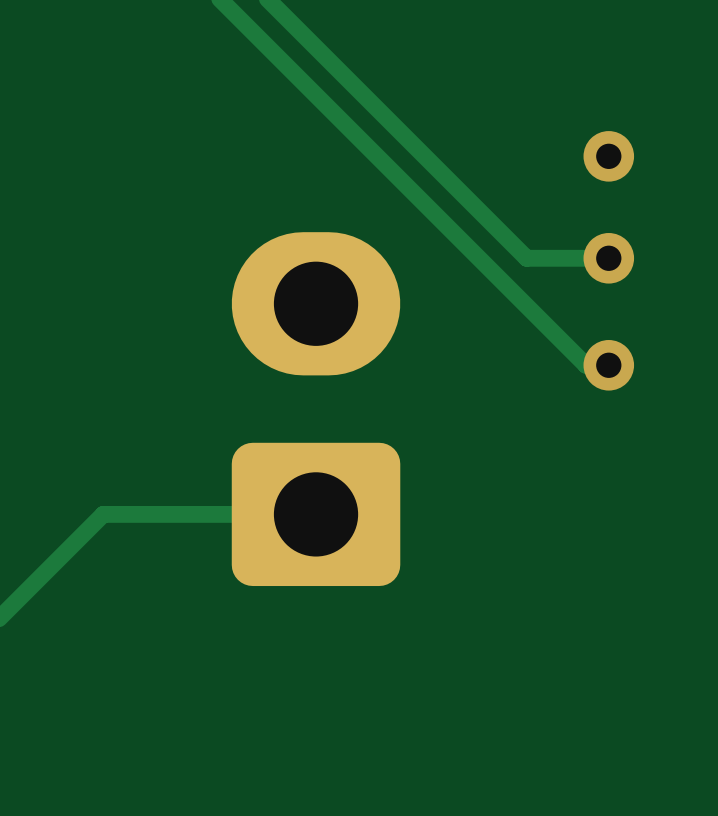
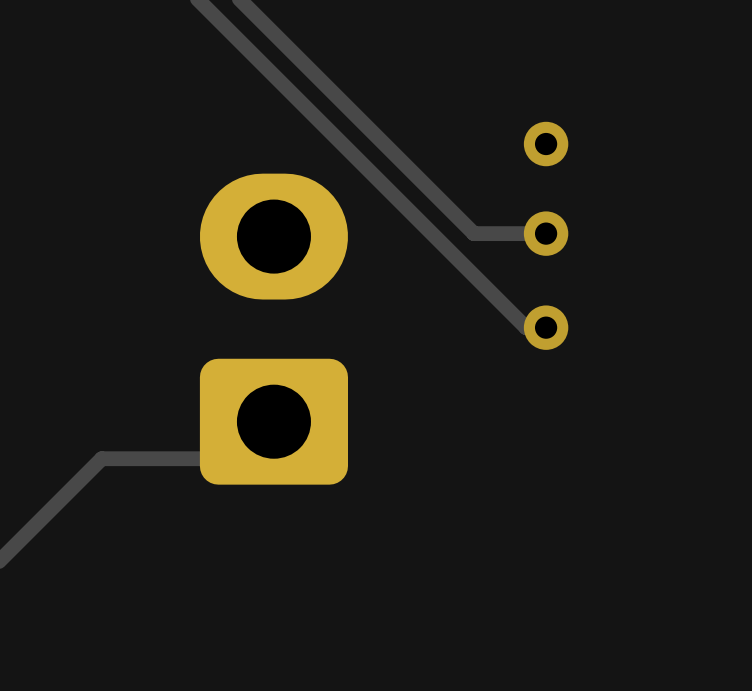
part position: (316, 409) -> (273, 329)

